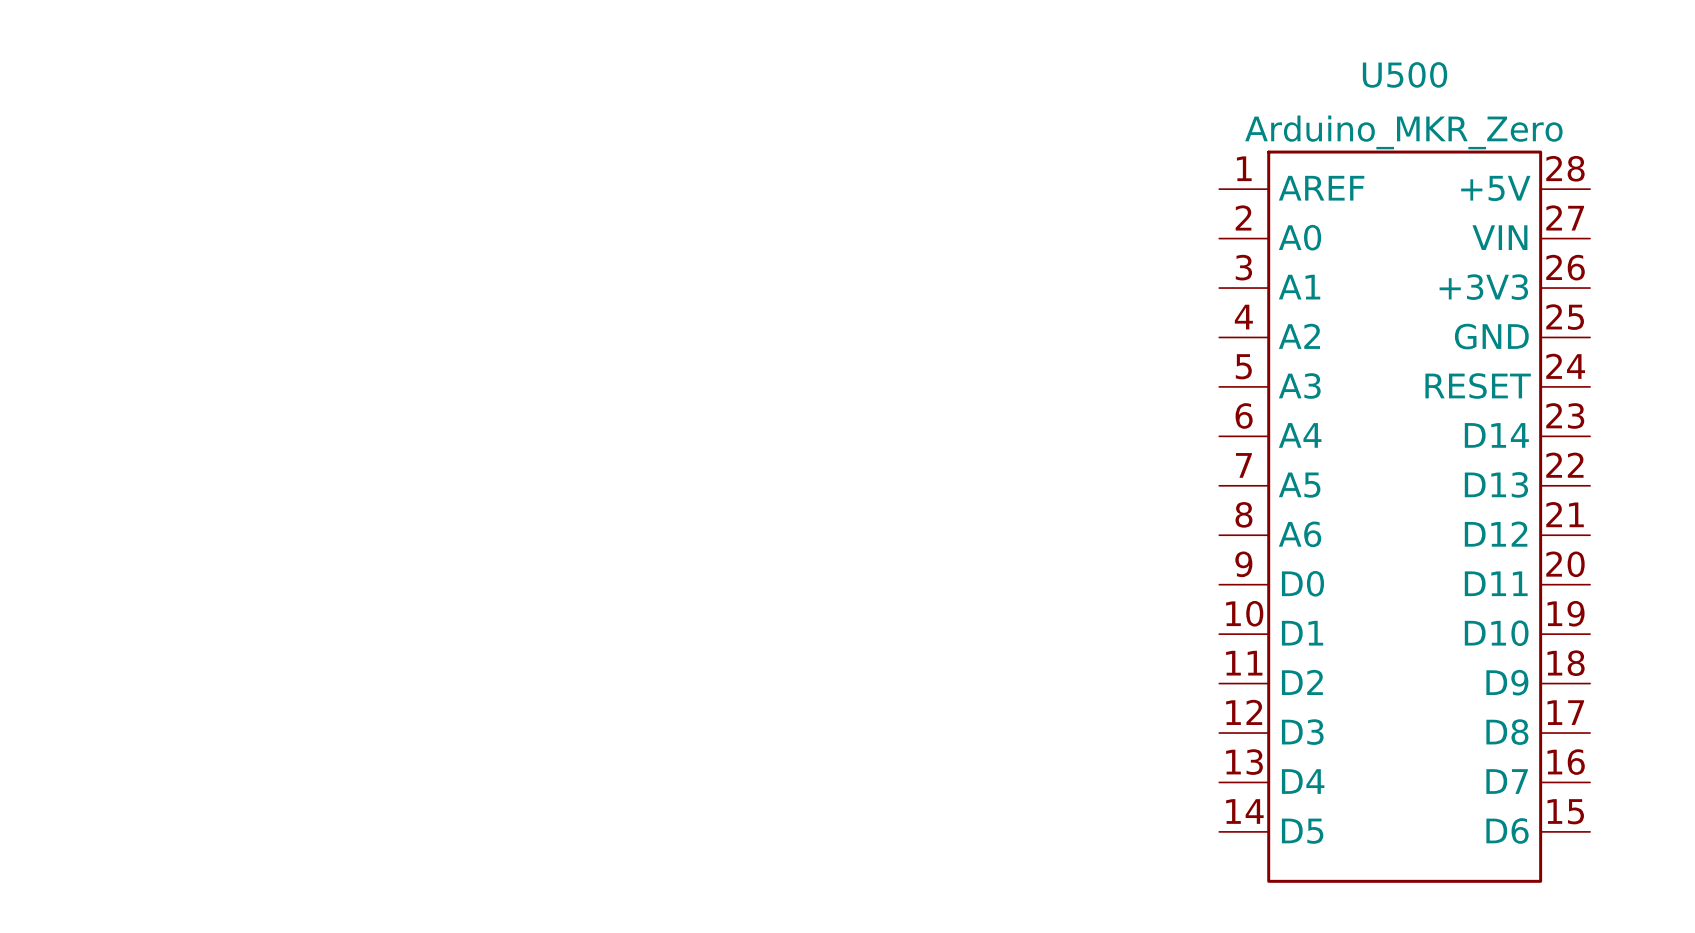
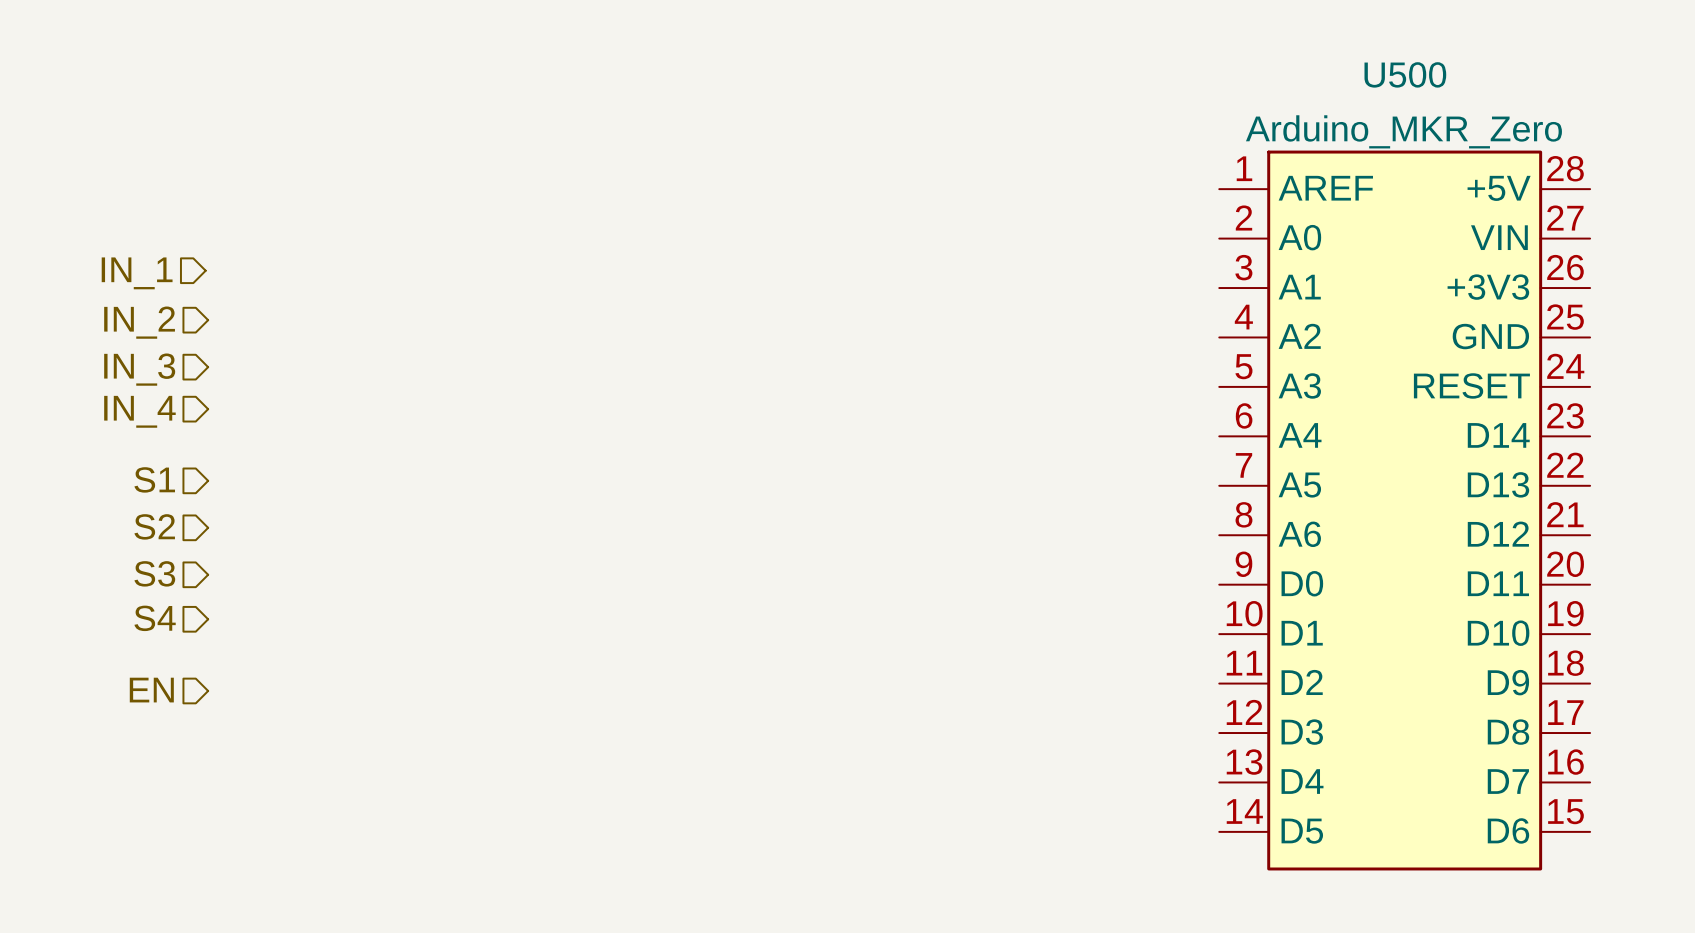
U500 symbol: [1219, 150, 1591, 883] -> [1219, 150, 1591, 871]
hierarchical label: none -> IN_1 (137, 273)
hierarchical label: none -> IN_2 (139, 322)
hierarchical label: none -> IN_3 (139, 369)
hierarchical label: none -> IN_4 (139, 411)
hierarchical label: none -> S1 (154, 479)
hierarchical label: none -> S2 (154, 526)
hierarchical label: none -> S3 (154, 573)
hierarchical label: none -> S4 (155, 618)
hierarchical label: none -> EN (151, 690)

